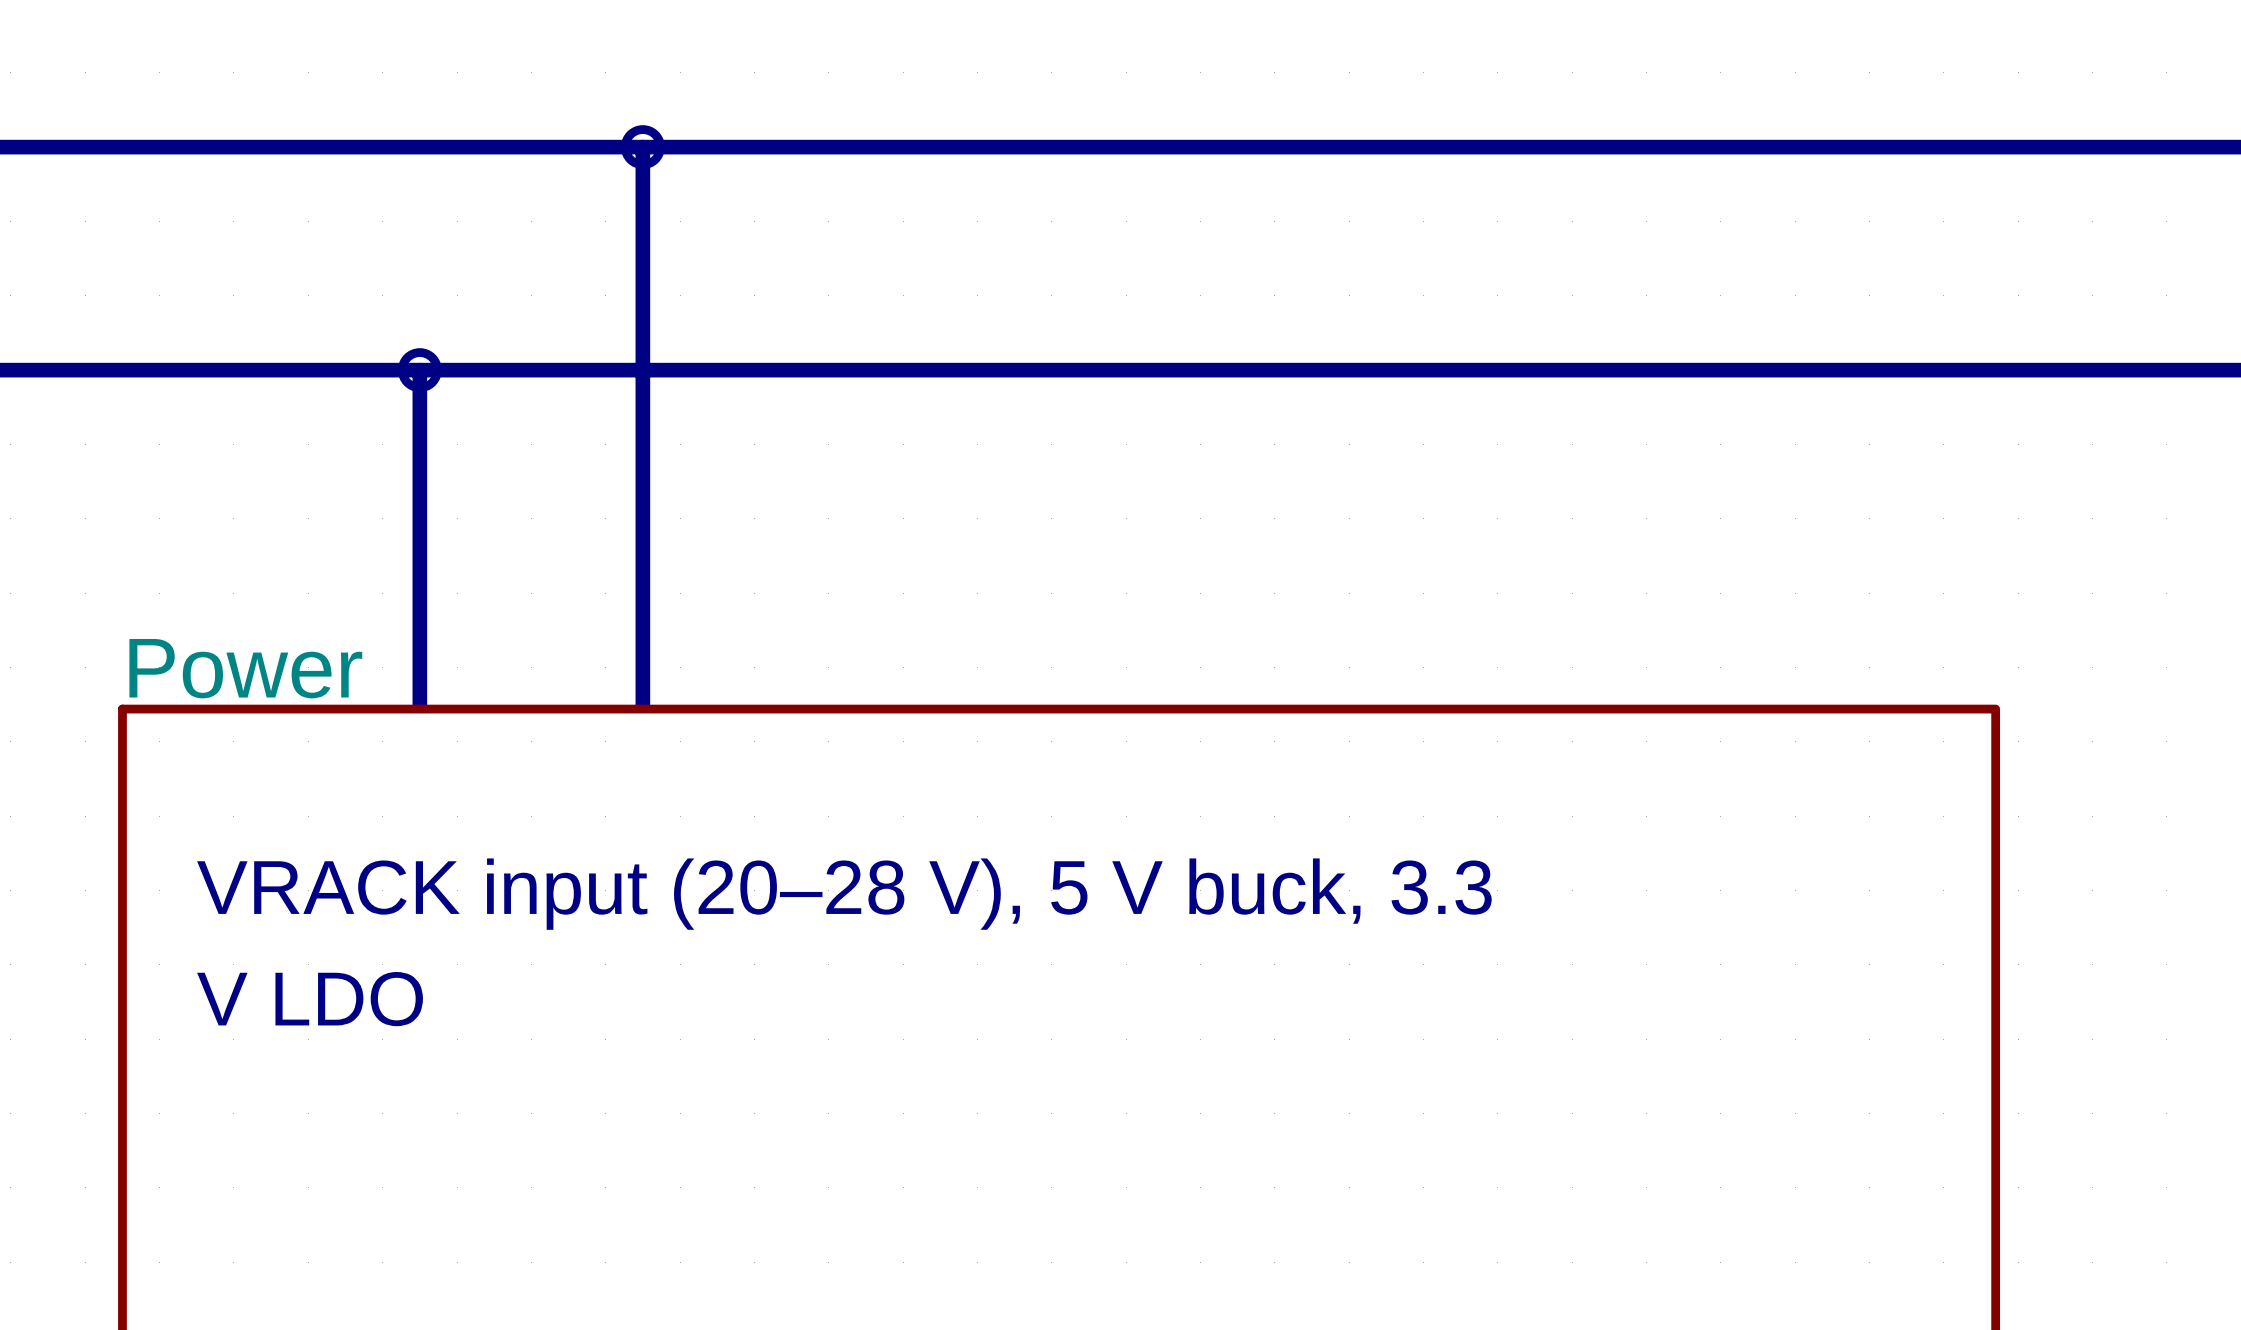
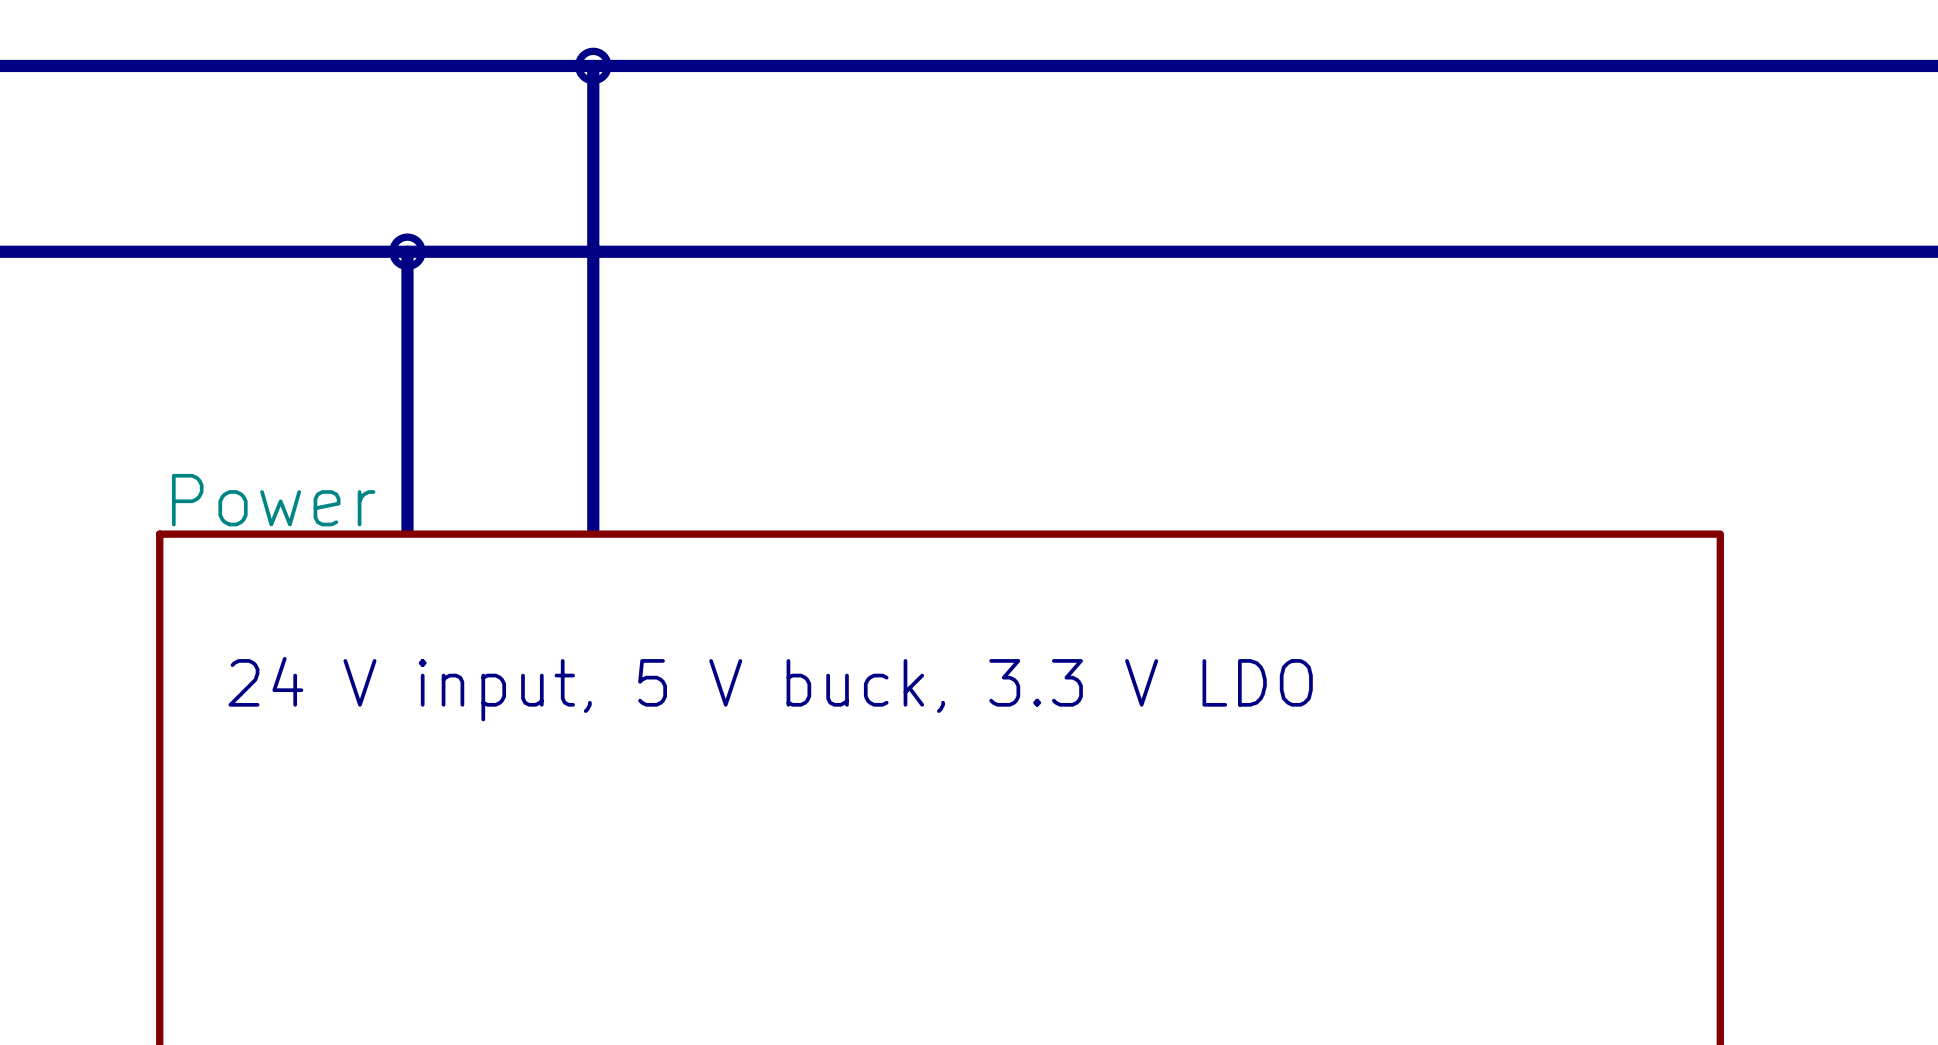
text: VRACK input (20–28 V), 5 V buck, 3.3 (844, 894) -> 24 V input, 5 V buck, 3.3 V LDO (770, 689)
text: V LDO (310, 999) -> none

